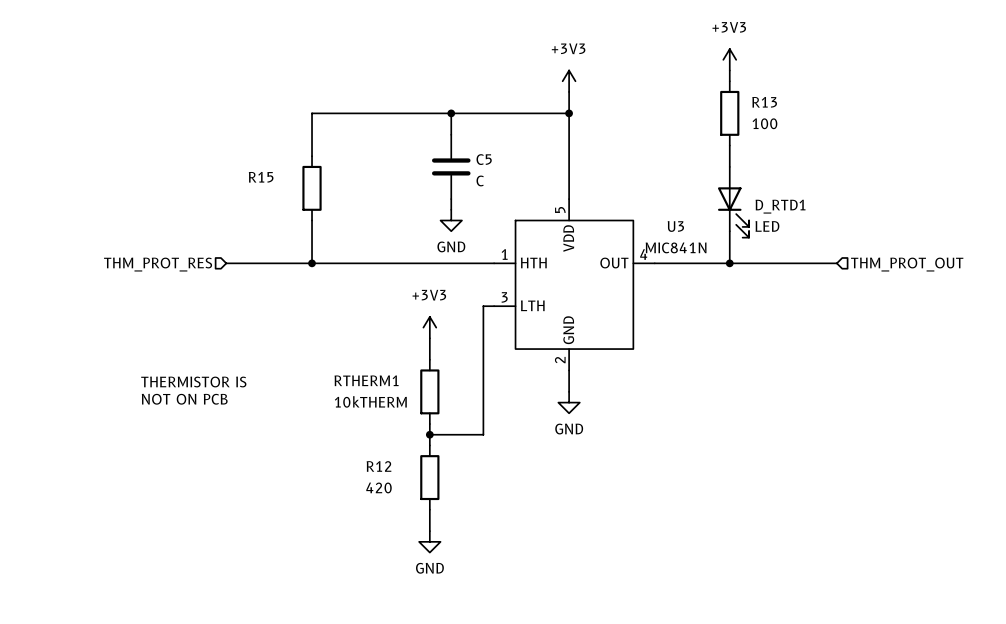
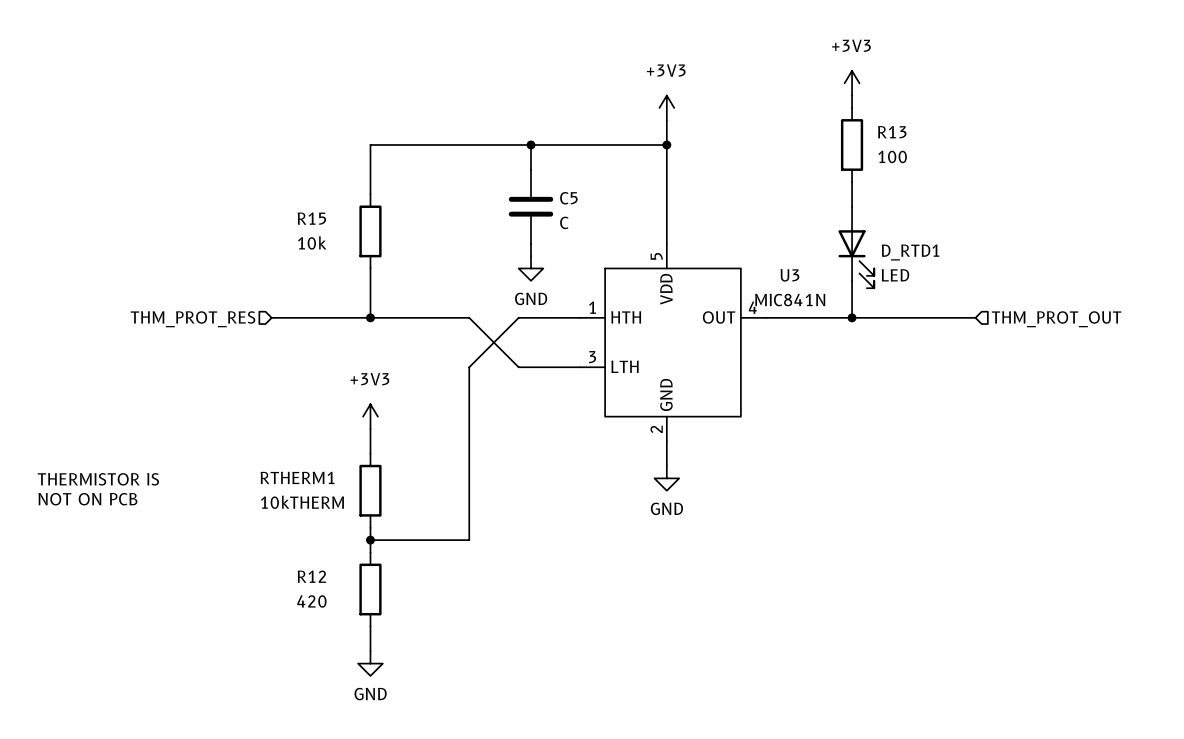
R15 value: none -> 10k (312, 242)
wire: (397, 263) (440, 263) -> (469, 317) (518, 367) (568, 367)
wire: none -> (518, 317) (469, 367) (469, 540) (370, 540)
wire: (483, 306) (483, 434) (429, 434) -> none
power symbol position: +3V3 (429, 327) -> +3V3 (370, 416)
wire: (429, 338) (429, 359) -> (370, 428) (370, 453)
text position: THERMISTOR IS (193, 381) -> THERMISTOR IS (98, 479)
RTHERM1 position: (429, 391) -> (370, 490)
text position: NOT ON PCB (184, 399) -> NOT ON PCB (87, 499)
wire: (429, 424) (429, 445) -> (370, 527) (370, 552)
junction: (429, 434) -> none
junction: none -> (370, 540)
R12 position: (429, 477) -> (370, 589)
wire: (429, 509) (429, 531) -> (370, 626) (370, 651)
power symbol position: GND (429, 541) -> GND (370, 663)

